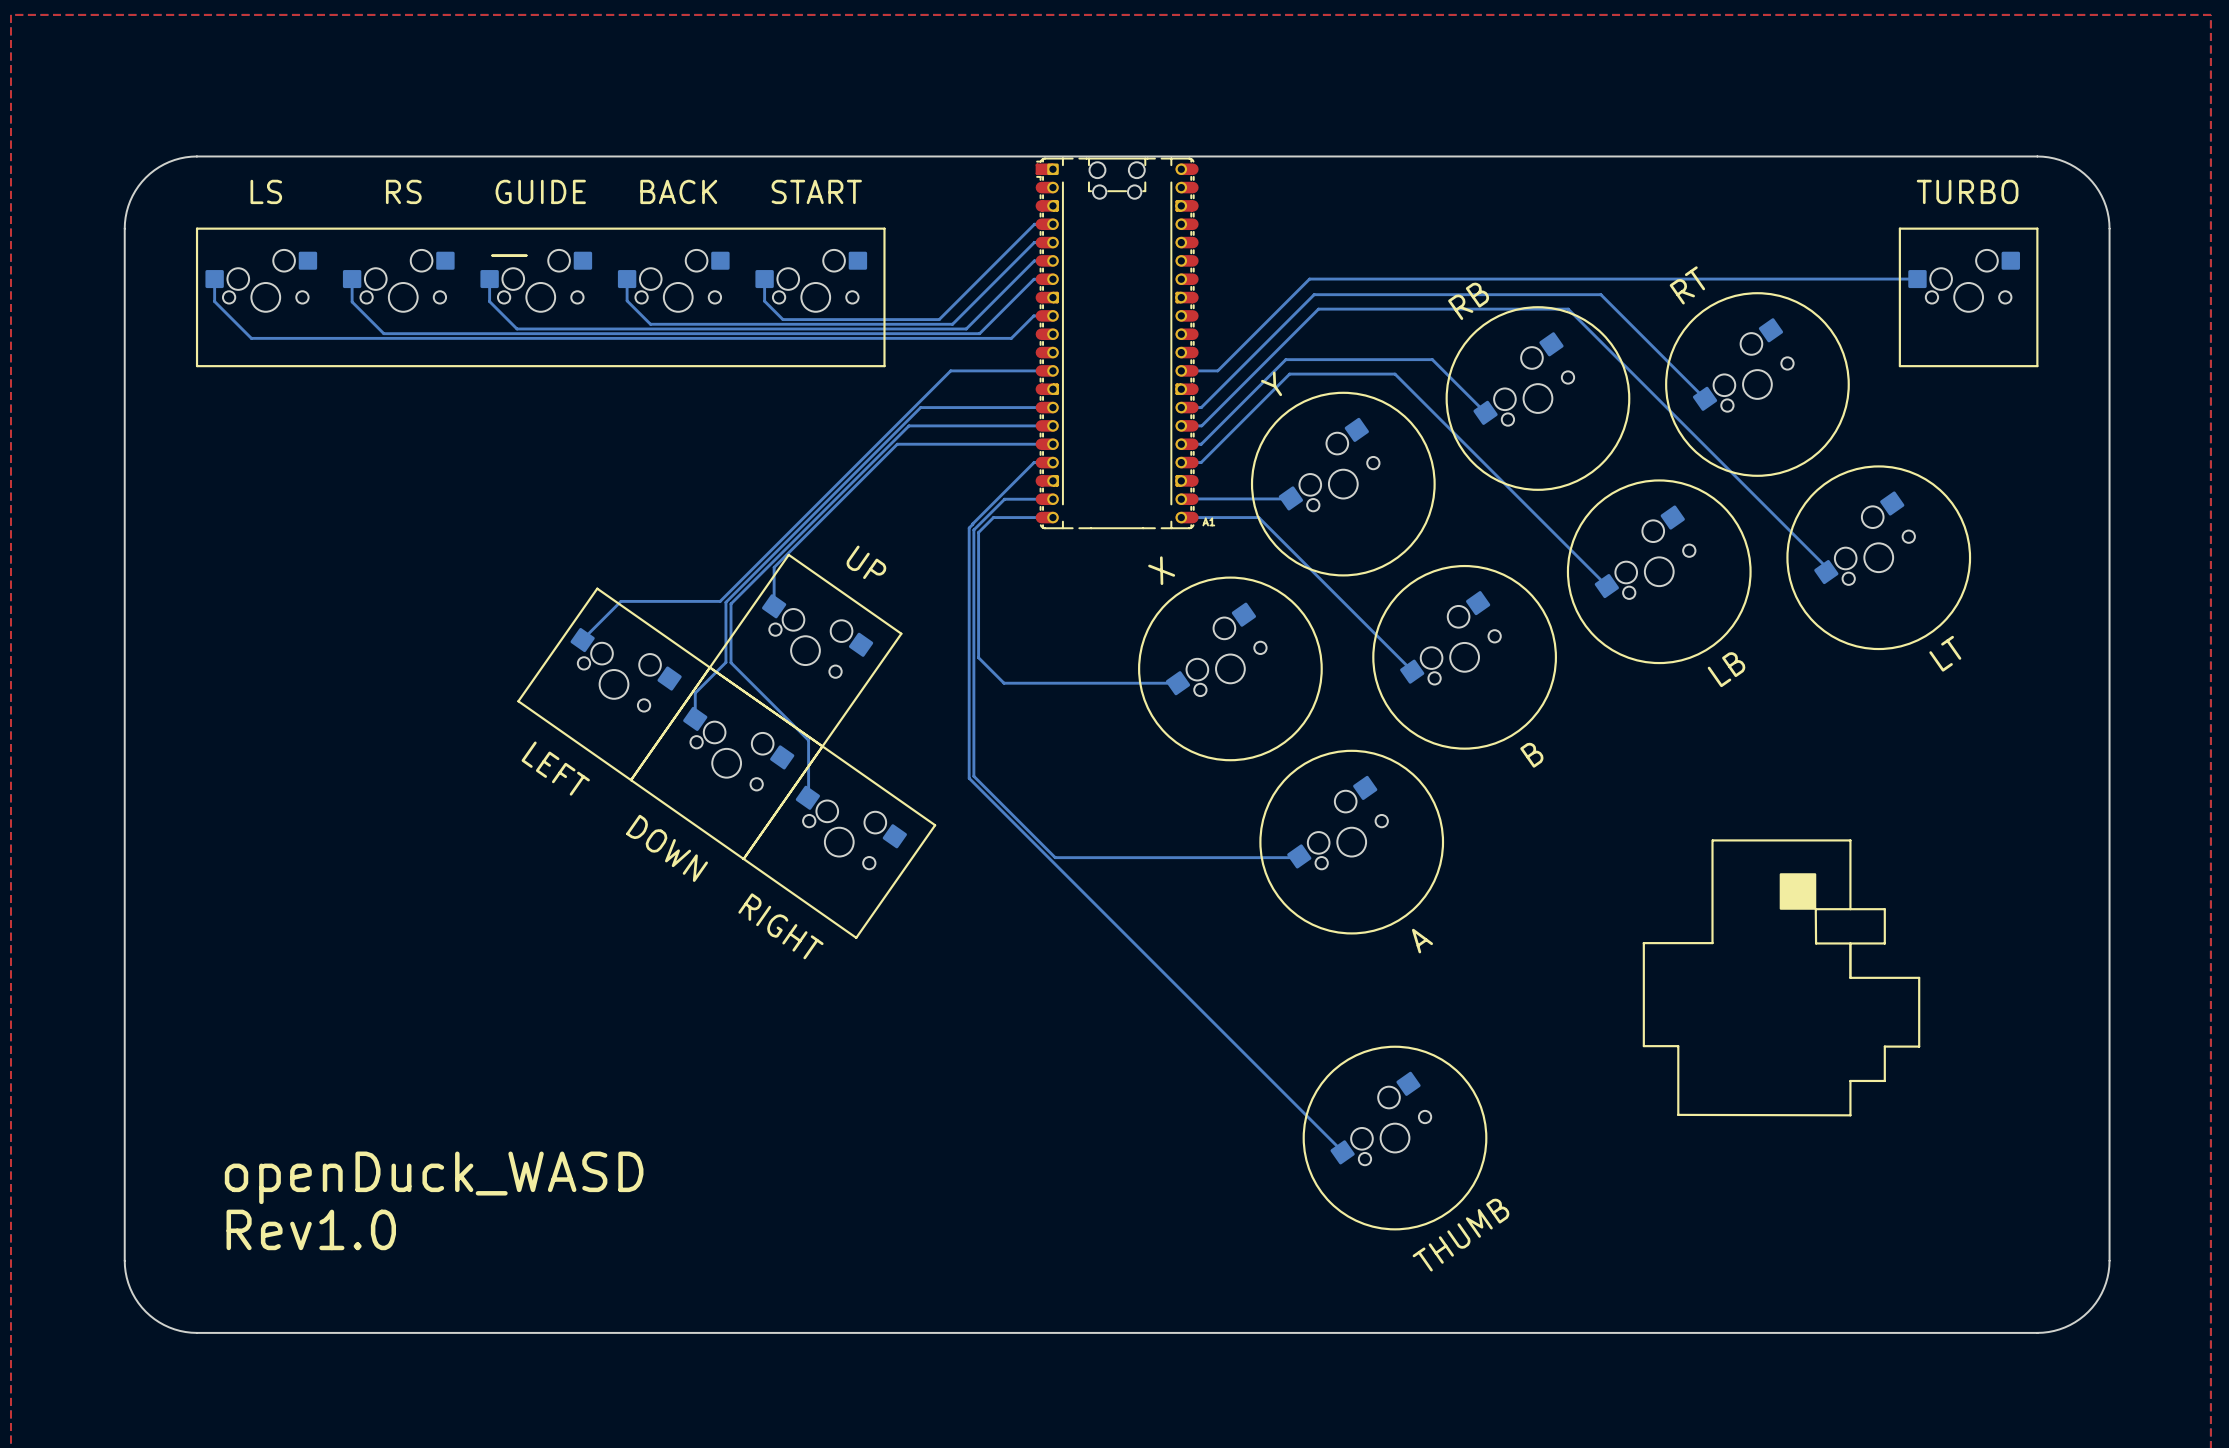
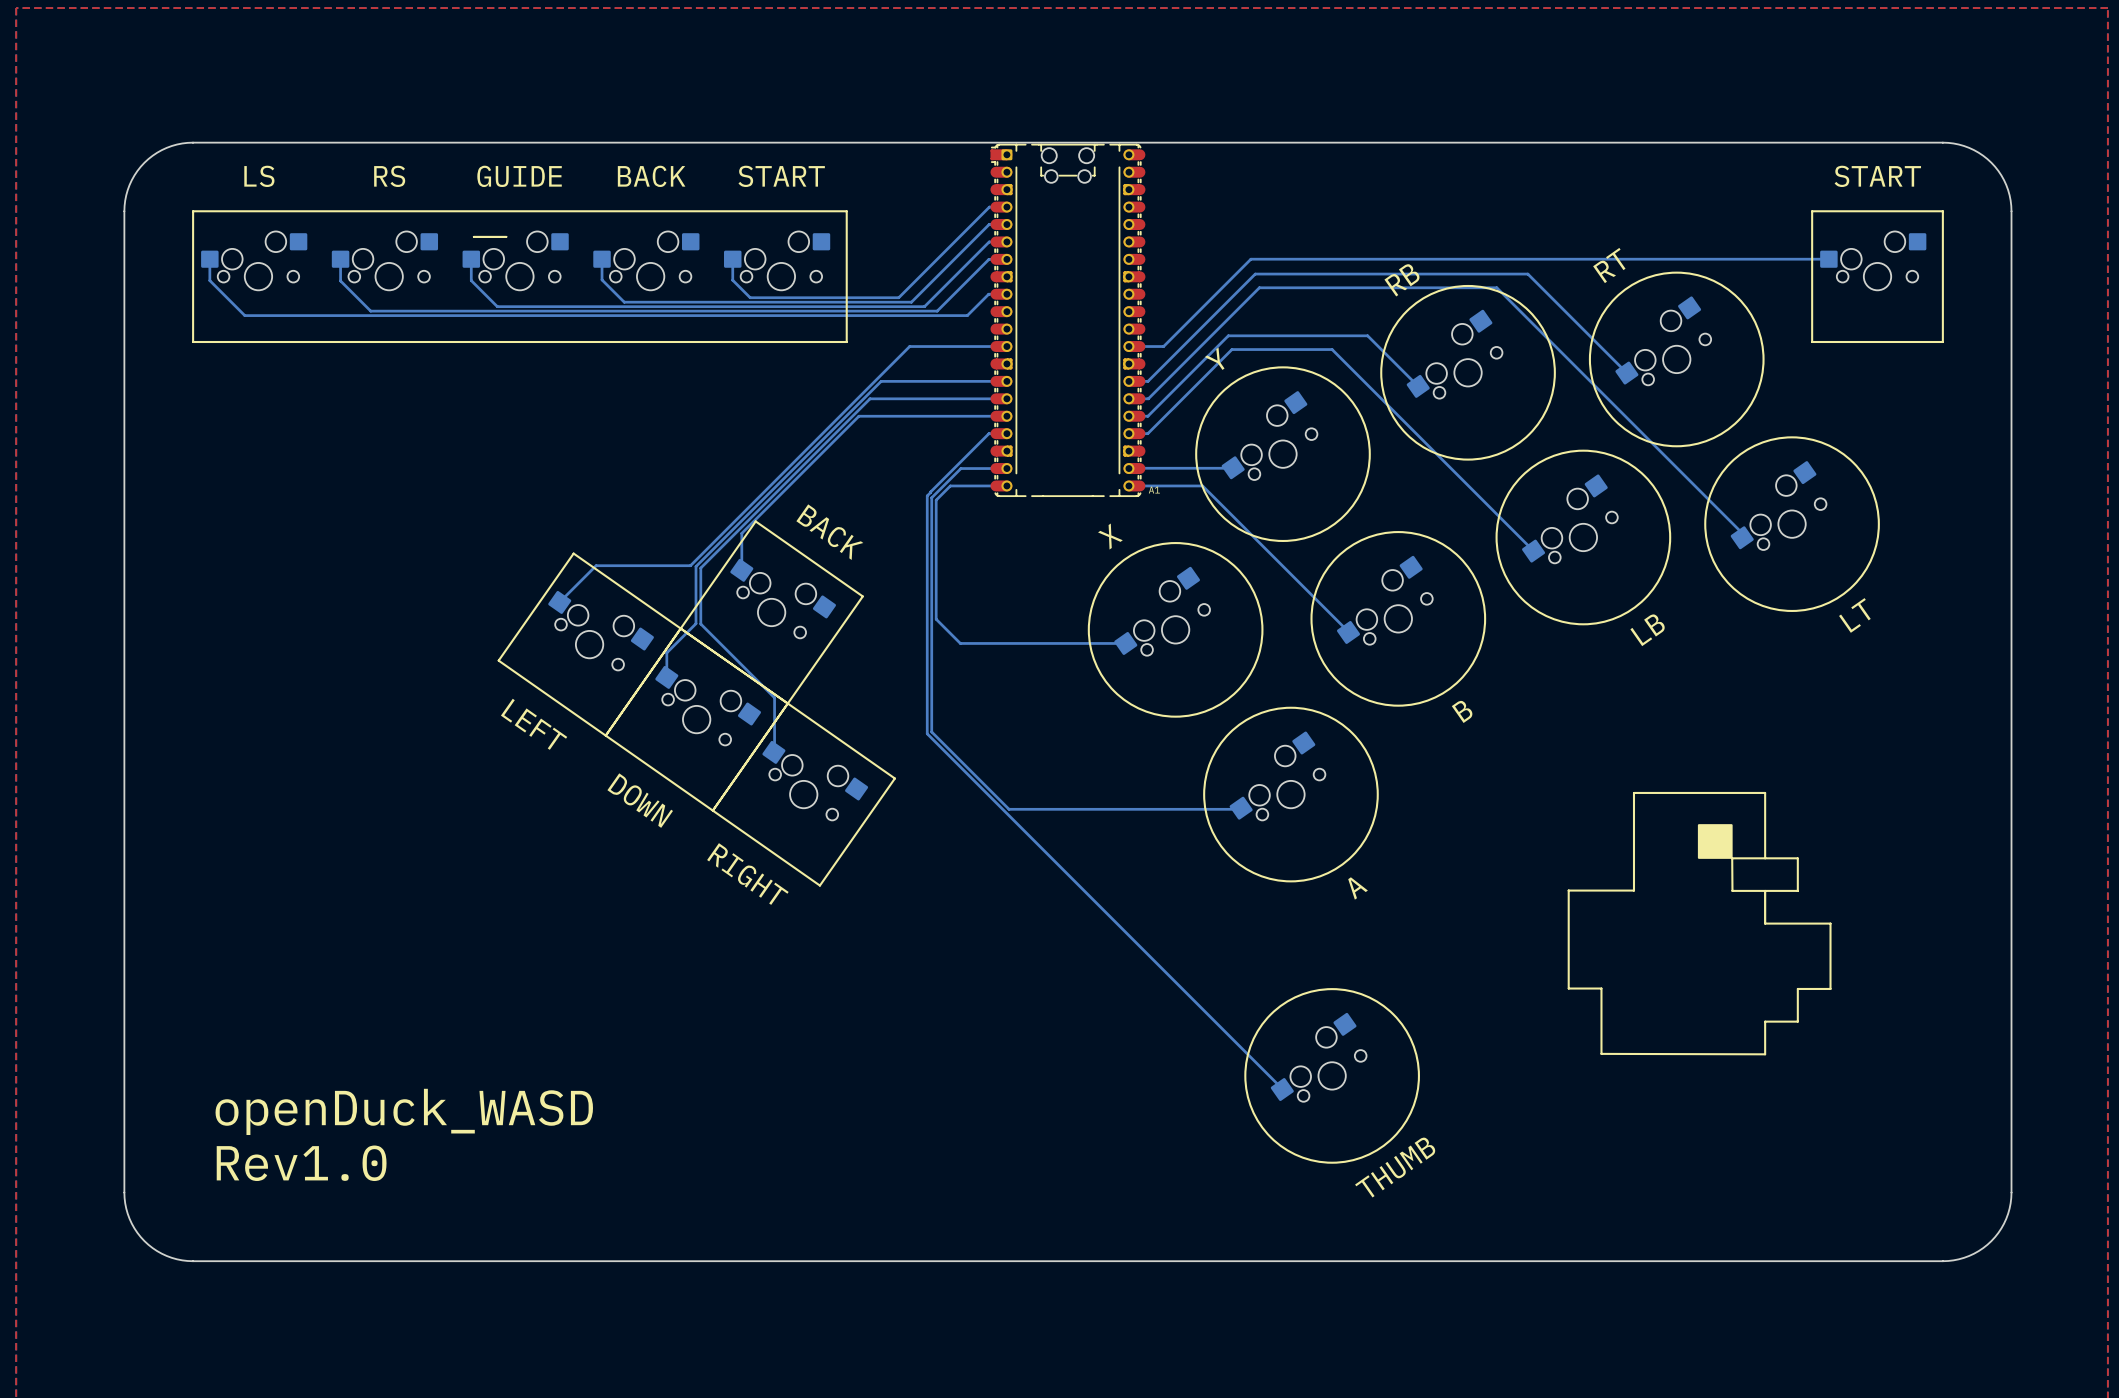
text: TURBO (1967, 191) -> START (1877, 176)
text: UP (866, 562) -> BACK (829, 532)

